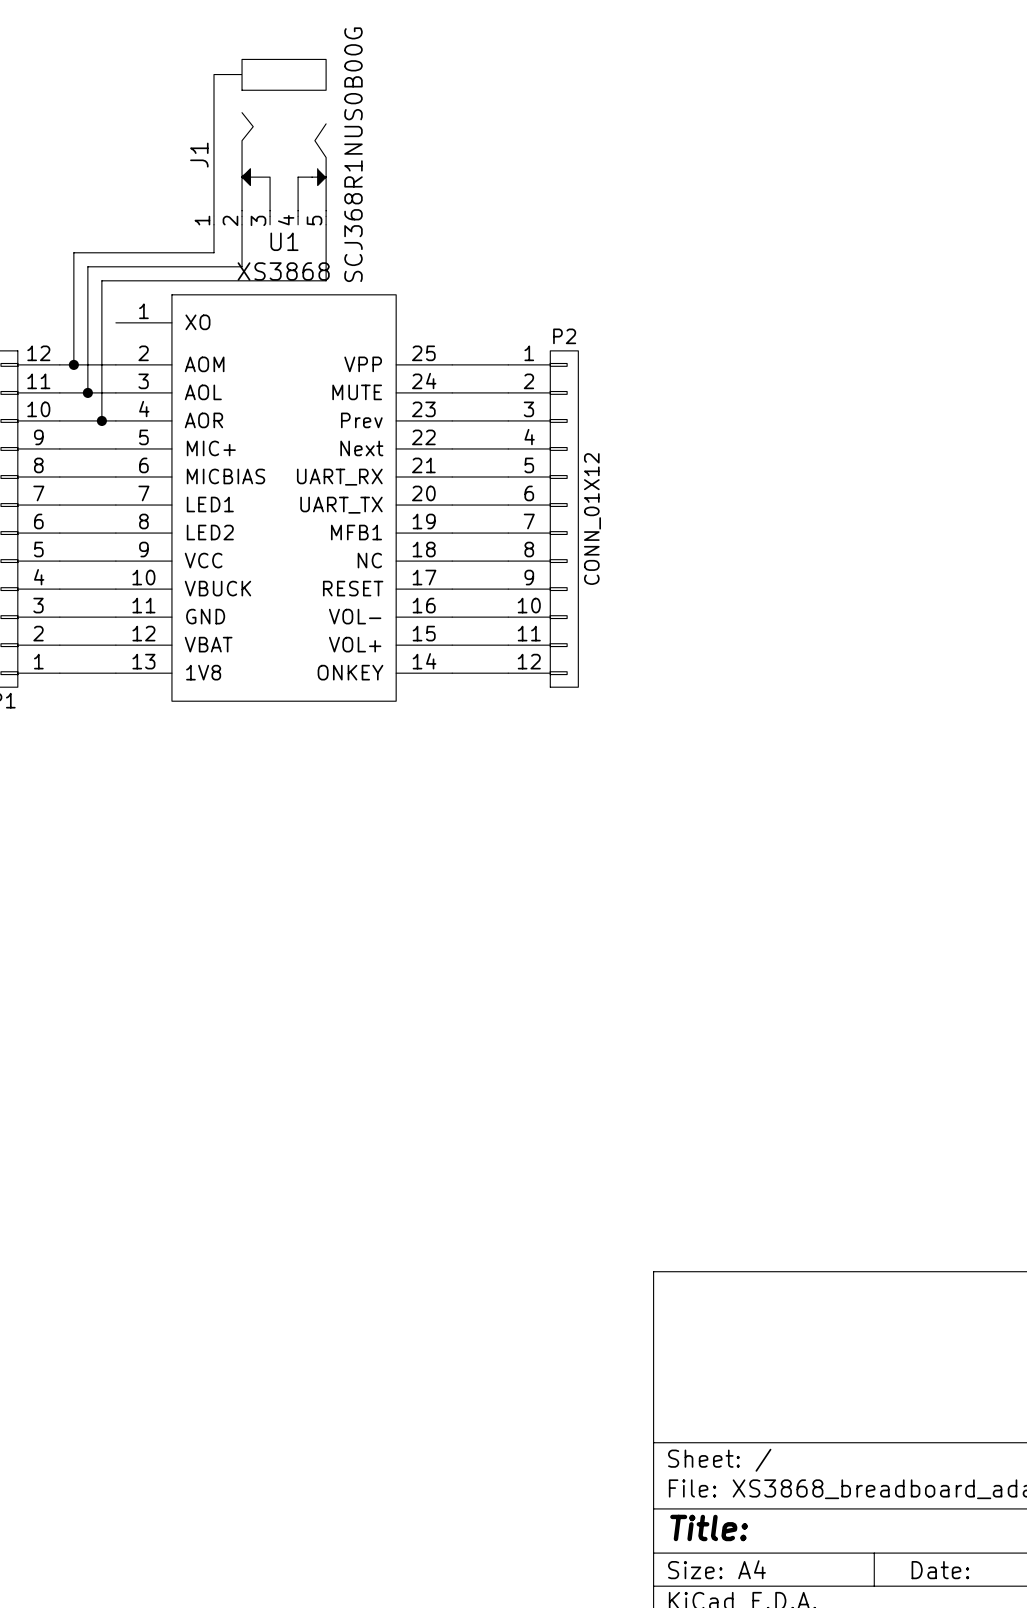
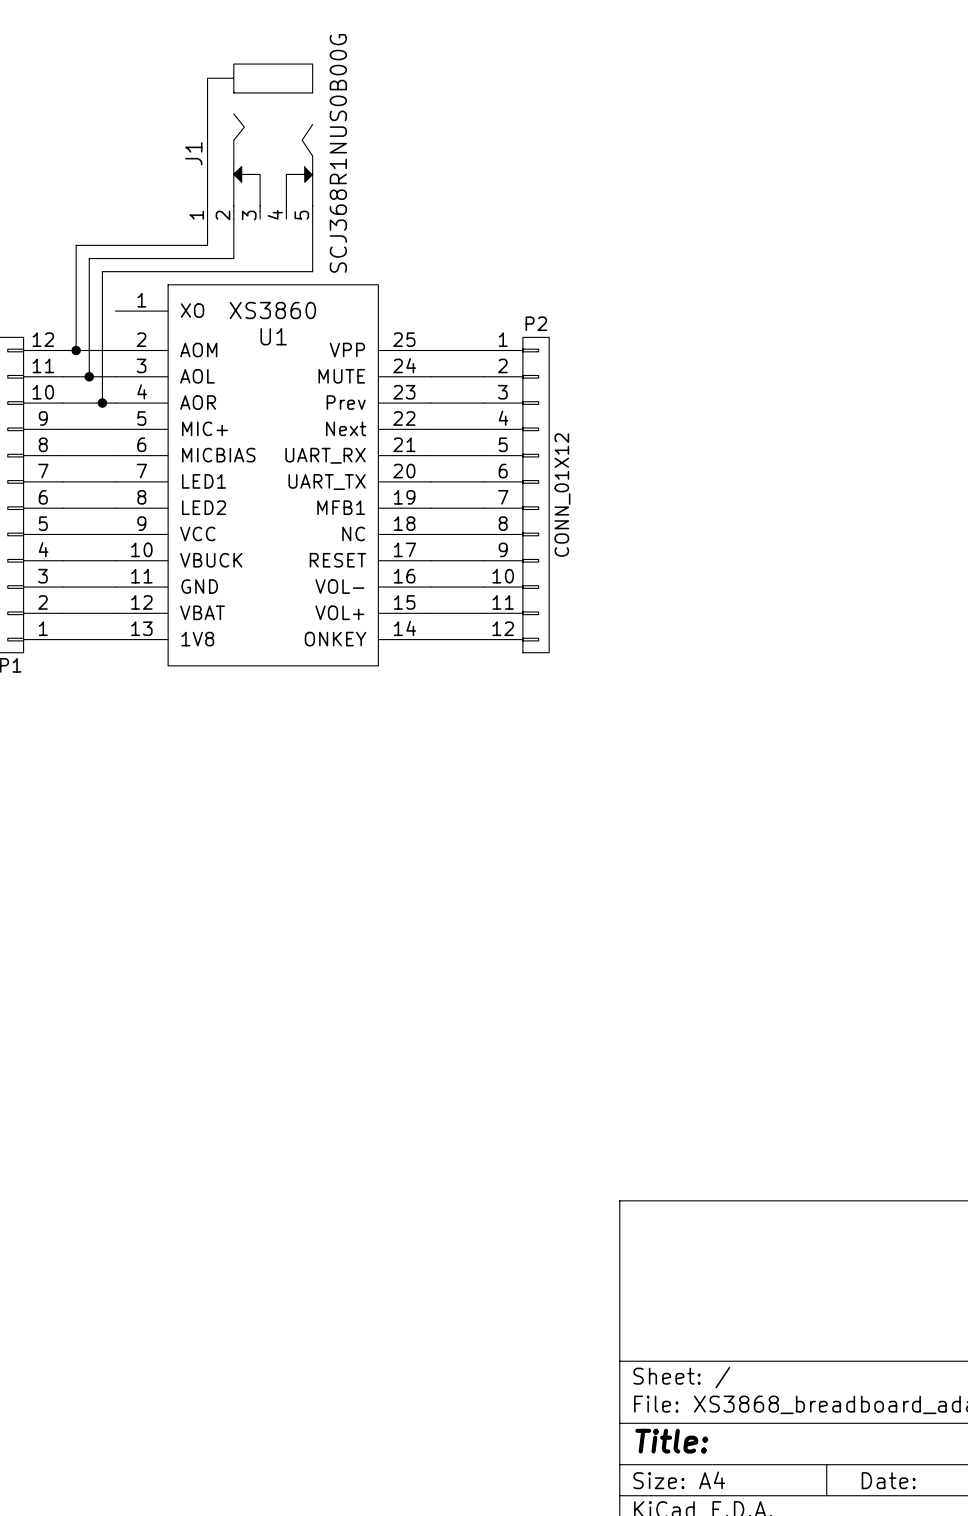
U1 name position: U1 (284, 241) -> U1 (273, 336)
U1 value: XS3868 (283, 271) -> XS3860 (272, 310)

